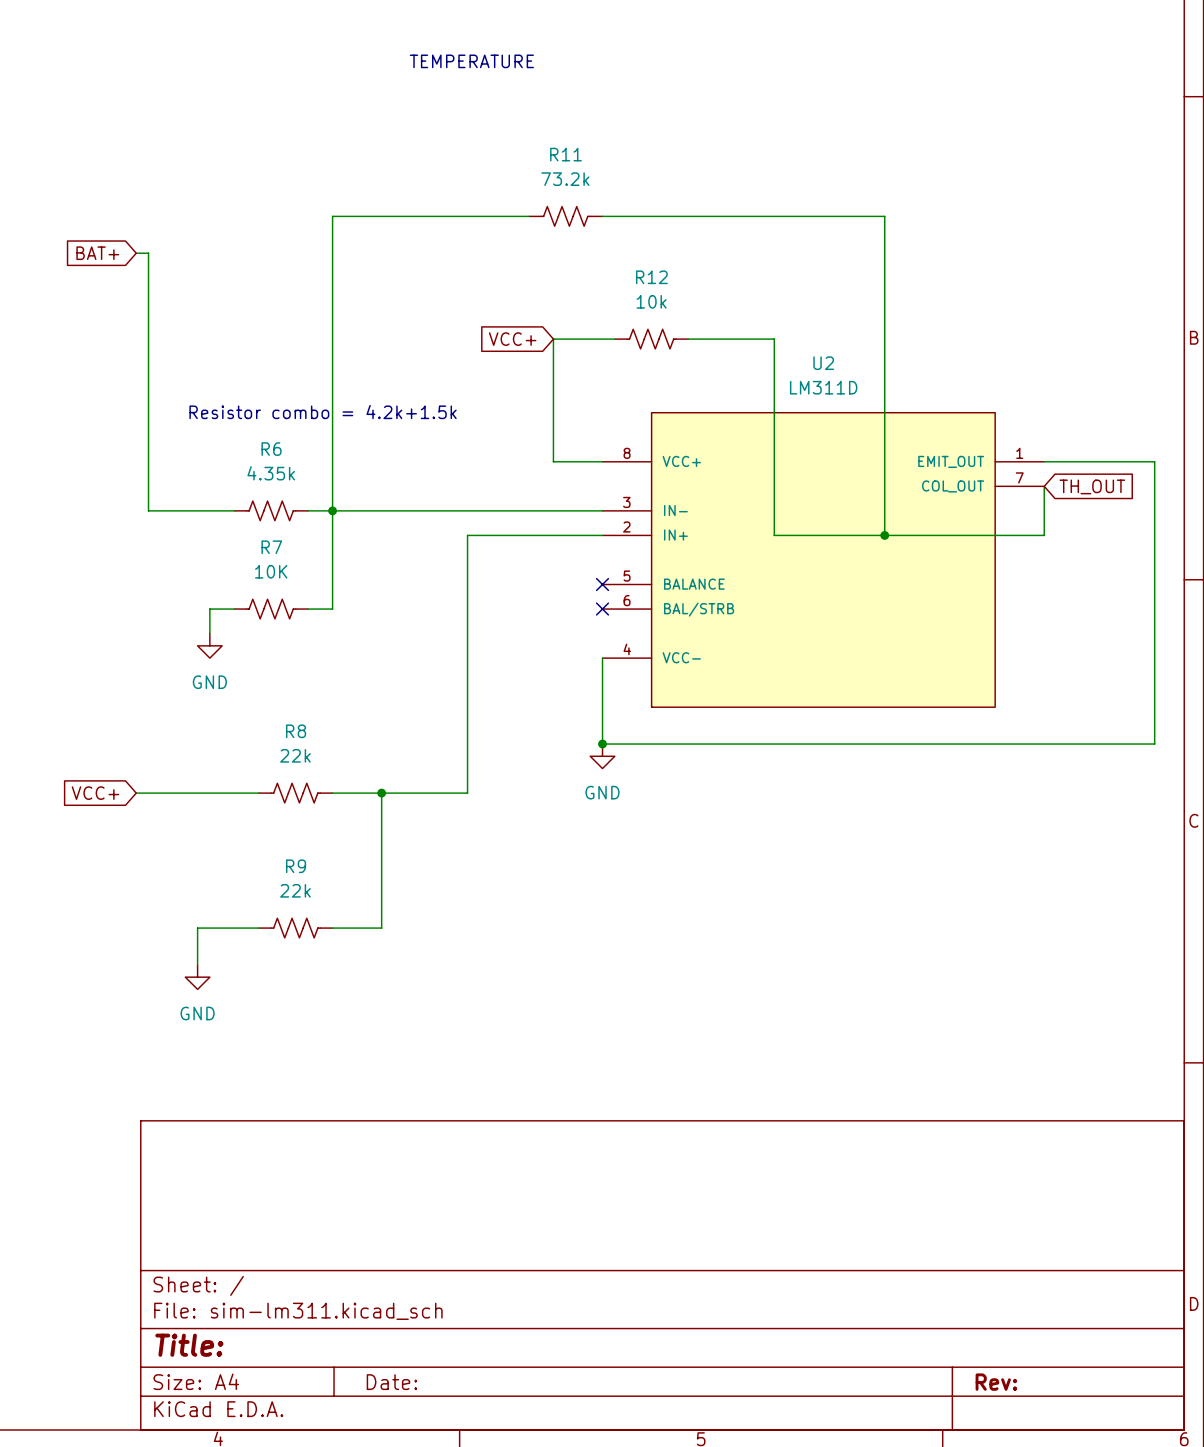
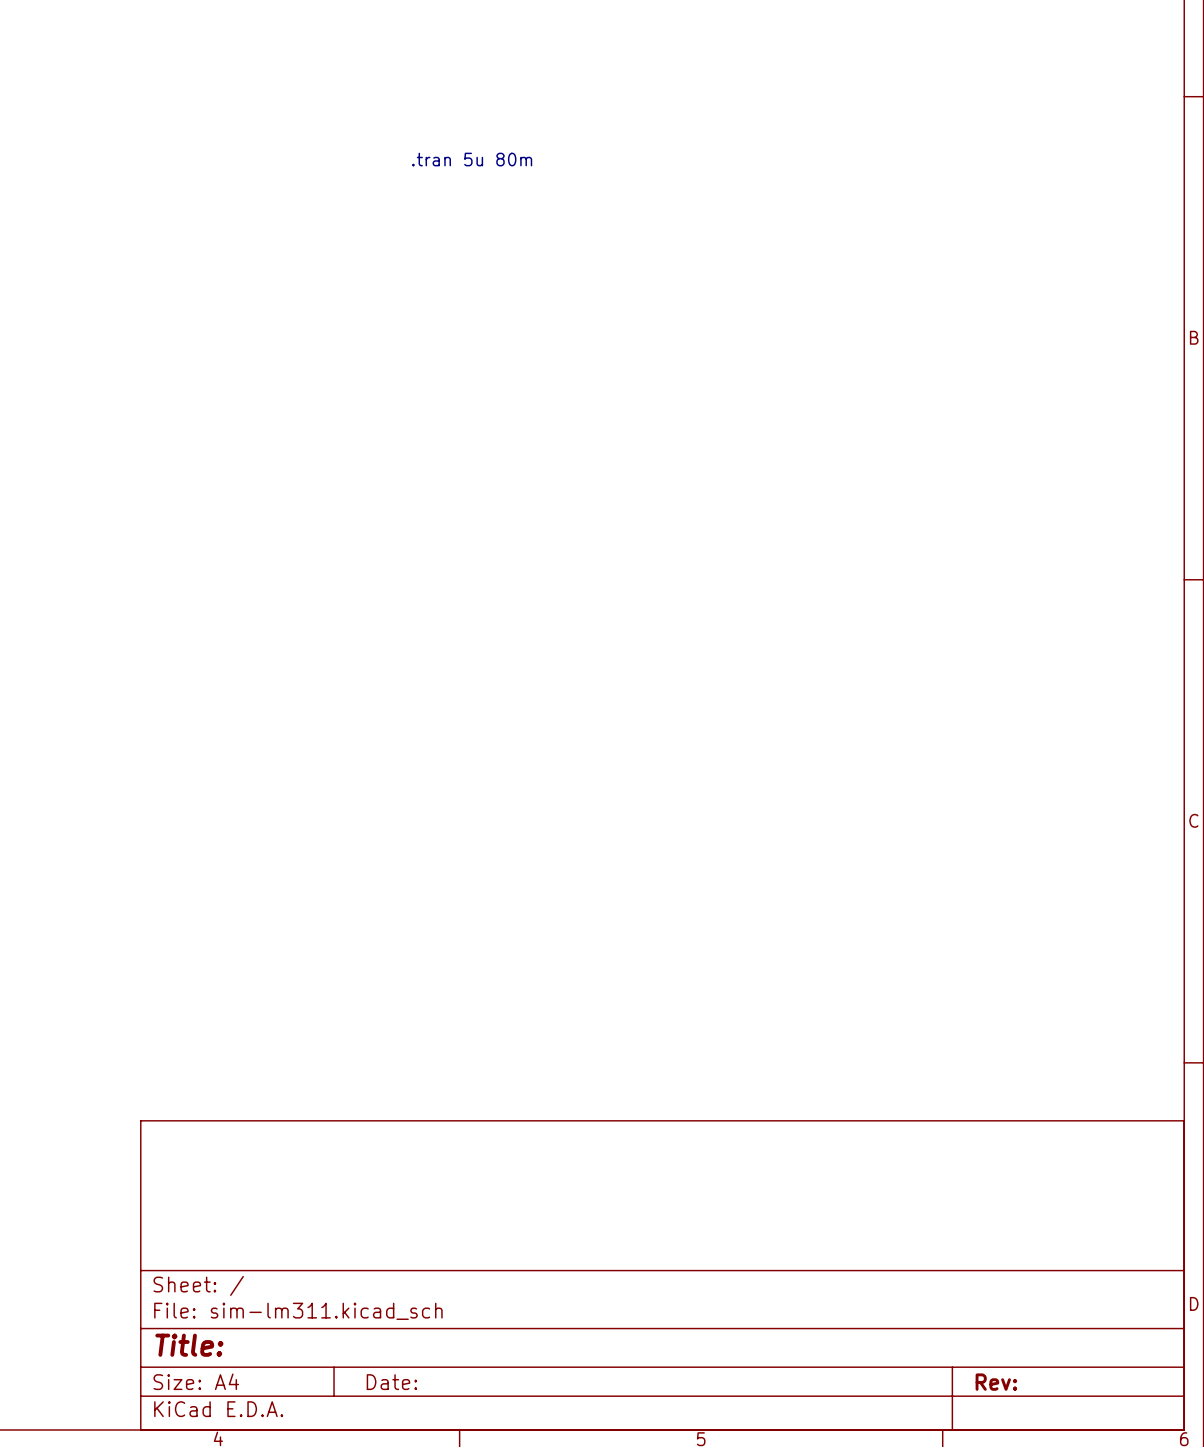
text: TEMPERATURE (471, 61) -> none
text: none -> .tran 5u 80m (472, 159)
wire: (528, 216) (332, 216) (332, 609) (308, 609) -> none
R11: 73.2k (565, 216) -> none
wire: (602, 216) (884, 216) (884, 535) -> none
global label: BAT+ (97, 253) -> none
wire: (136, 253) (148, 253) (148, 510) (234, 510) -> none
global label: VCC+ (512, 339) -> none
wire: (614, 339) (553, 339) (553, 461) (602, 461) -> none
R12: 10k (651, 339) -> none
wire: (688, 339) (774, 339) (774, 535) (1044, 535) (1044, 486) -> none
text: Resistor combo = 4.2k+1.5k (323, 412) -> none
wire: (1044, 461) (1154, 461) (1154, 744) (602, 744) (602, 658) -> none
global label: TH_OUT (1092, 486) -> none
R6: 4.35k (271, 510) -> none
wire: (308, 510) (602, 510) -> none
junction: (332, 510) -> none
wire: (602, 535) (467, 535) (467, 793) (332, 793) -> none
junction: (884, 535) -> none
U2: LM311D (823, 559) -> none
no-connect mark: (602, 584) -> none
wire: (234, 609) (209, 609) (209, 633) -> none
R7: 10K (271, 609) -> none
no-connect mark: (602, 609) -> none
power symbol: GND (209, 645) -> none
junction: (602, 744) -> none
power symbol: GND (602, 756) -> none
global label: VCC+ (95, 793) -> none
wire: (136, 793) (258, 793) -> none
R8: 22k (295, 793) -> none
wire: (381, 793) (381, 928) (332, 928) -> none
junction: (381, 793) -> none
wire: (258, 928) (197, 928) (197, 964) -> none
R9: 22k (295, 928) -> none
power symbol: GND (197, 977) -> none

